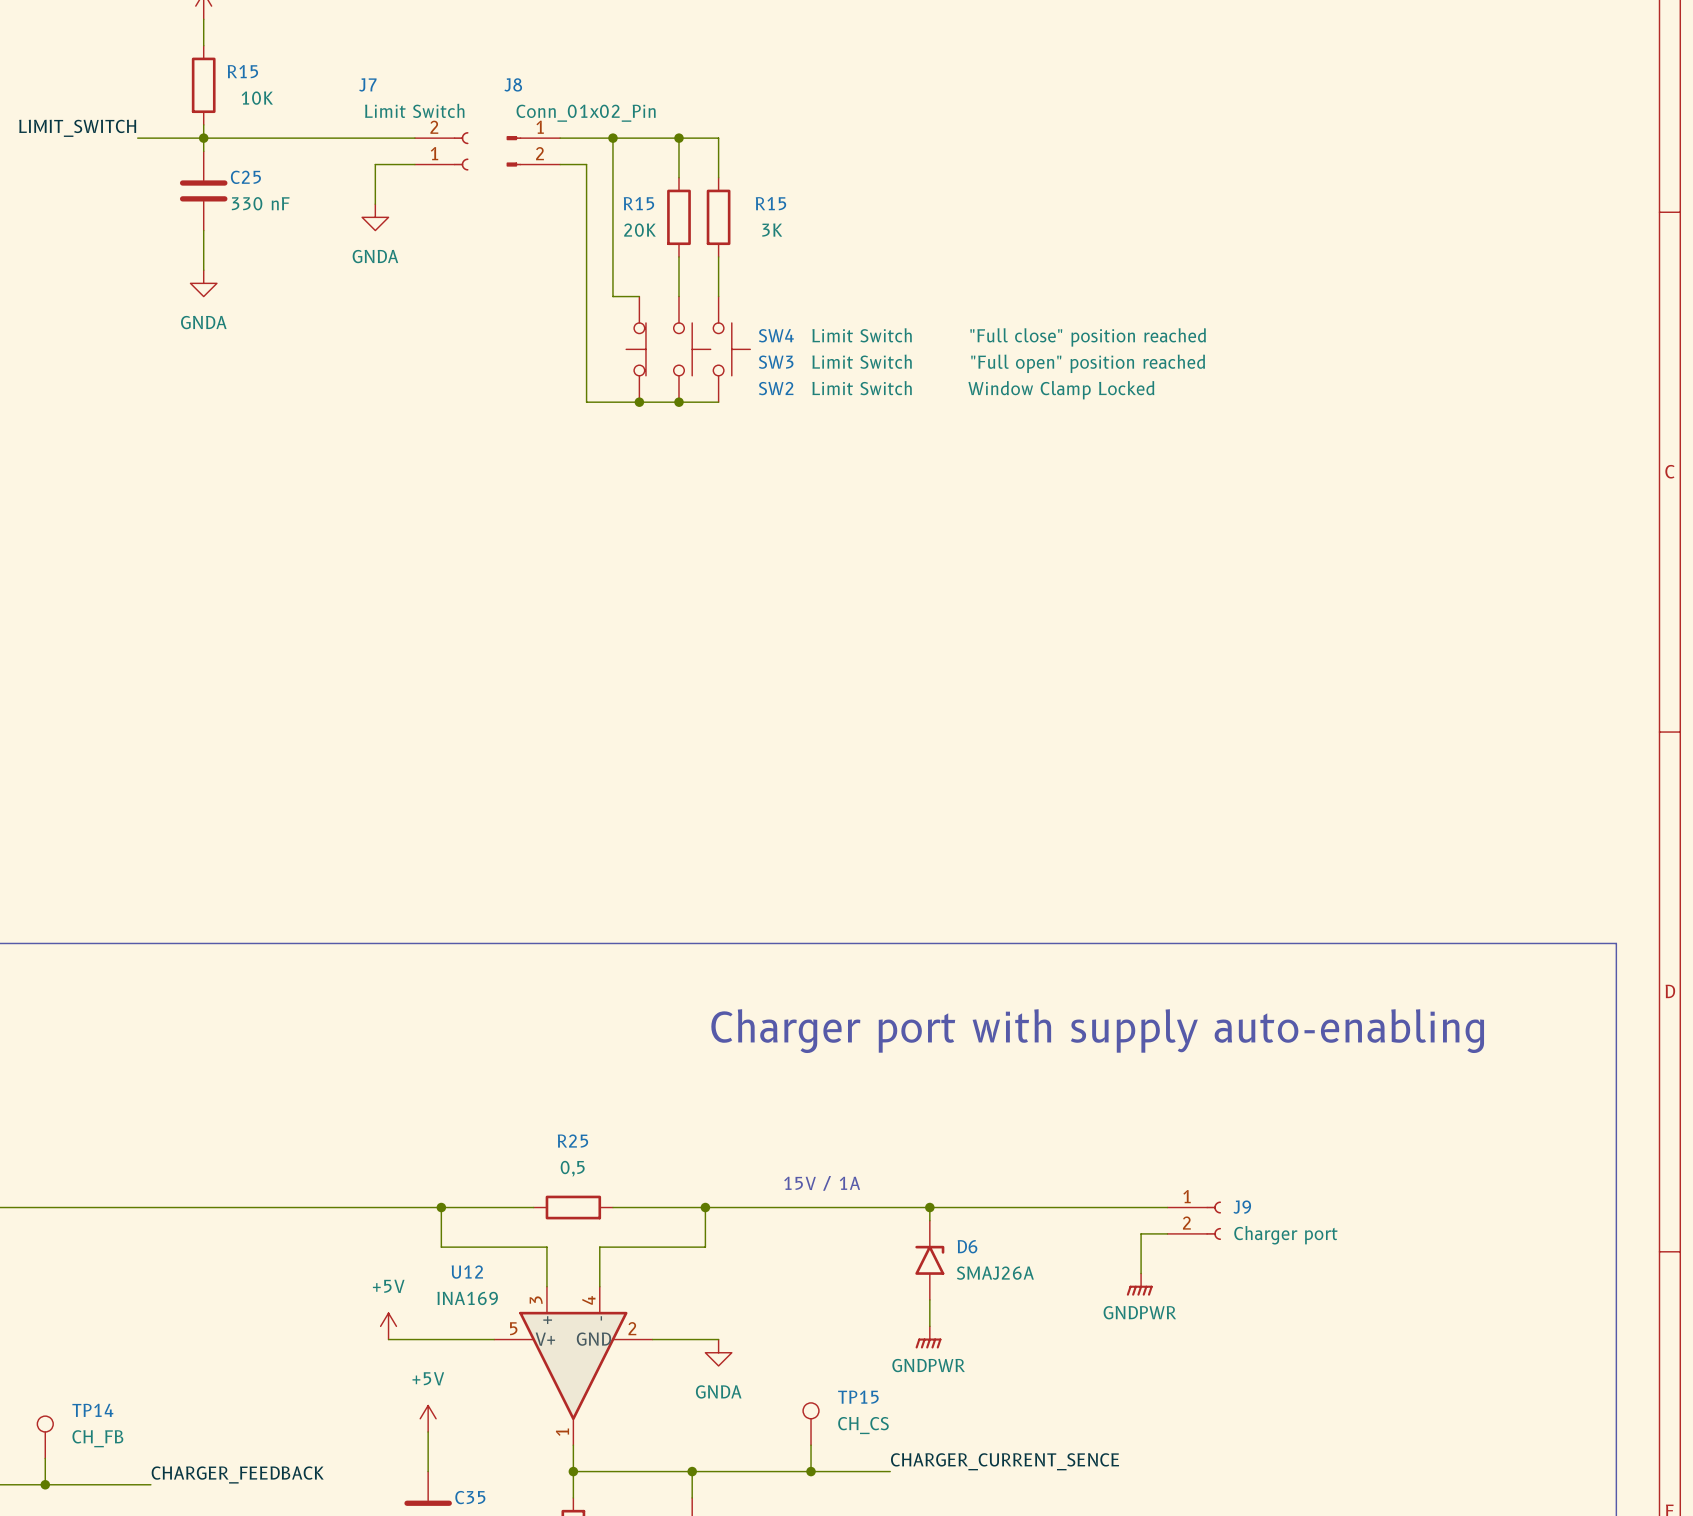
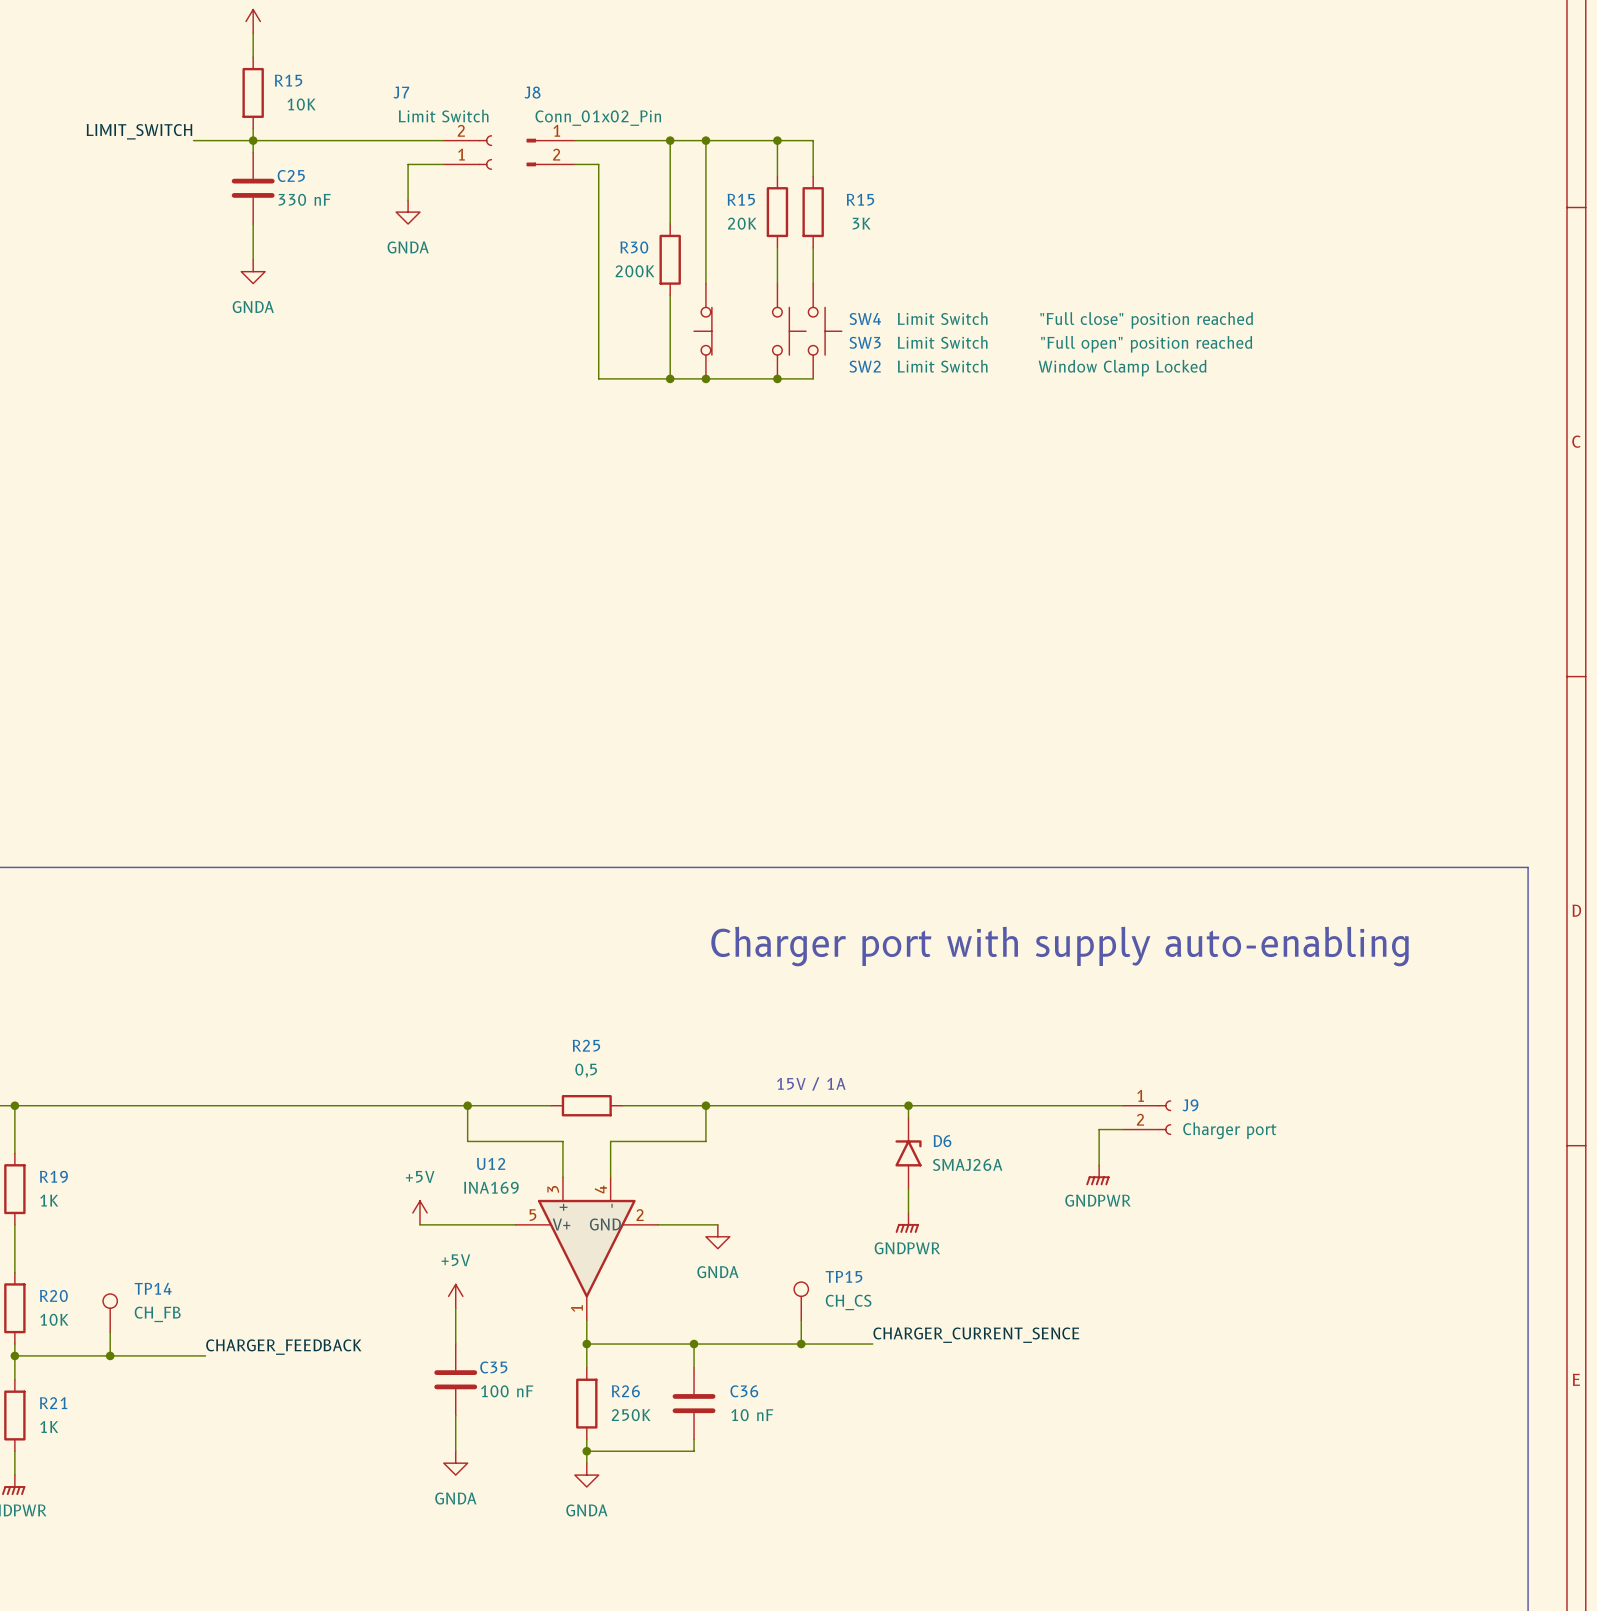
wire: (612, 138) (612, 296) (639, 296) -> none
junction: (612, 138) -> none
wire: none -> (670, 140) (670, 224)
junction: none -> (670, 140)
wire: (678, 138) (678, 177) -> (777, 140) (777, 176)
junction: (678, 138) -> none
wire: none -> (705, 140) (705, 283)
junction: none -> (705, 140)
wire: (718, 138) (718, 177) -> (717, 140) (813, 140) (813, 176)
junction: none -> (777, 140)
R15 position: (678, 217) -> (777, 212)
R15 position: (718, 217) -> (813, 212)
wire: (678, 256) (678, 296) -> (777, 247) (777, 283)
wire: (718, 256) (718, 296) -> (813, 247) (813, 283)
R30: none -> 200K (670, 259)
wire: none -> (670, 295) (670, 378)
SW2 position: (636, 349) -> (702, 331)
SW3 position: (692, 349) -> (789, 331)
SW4 position: (731, 349) -> (825, 331)
SW2 name position: SW2 (776, 388) -> SW2 (865, 366)
SW2 value position: Limit Switch (862, 388) -> Limit Switch (942, 366)
SW2 text position: Window Clamp Locked (1061, 390) -> Window Clamp Locked (1122, 368)
junction: (639, 402) -> none
junction: none -> (670, 378)
junction: (678, 402) -> none
junction: none -> (705, 378)
wire: none -> (717, 378) (813, 378)
junction: none -> (777, 378)

